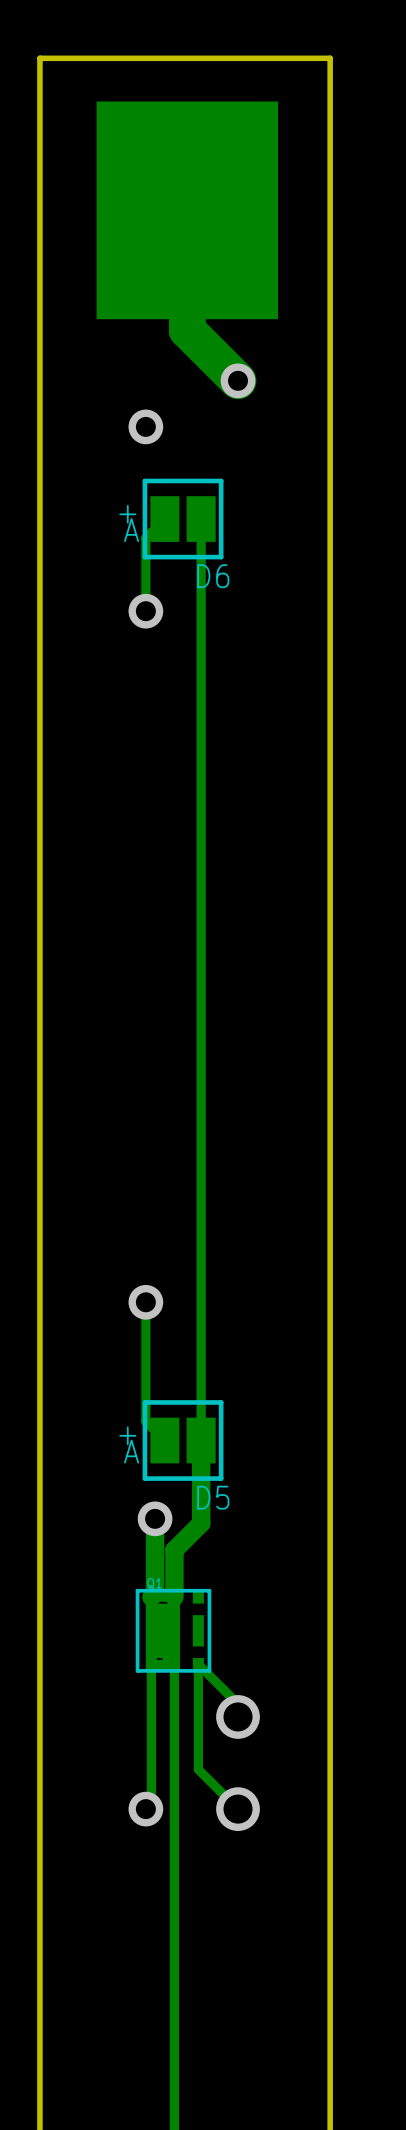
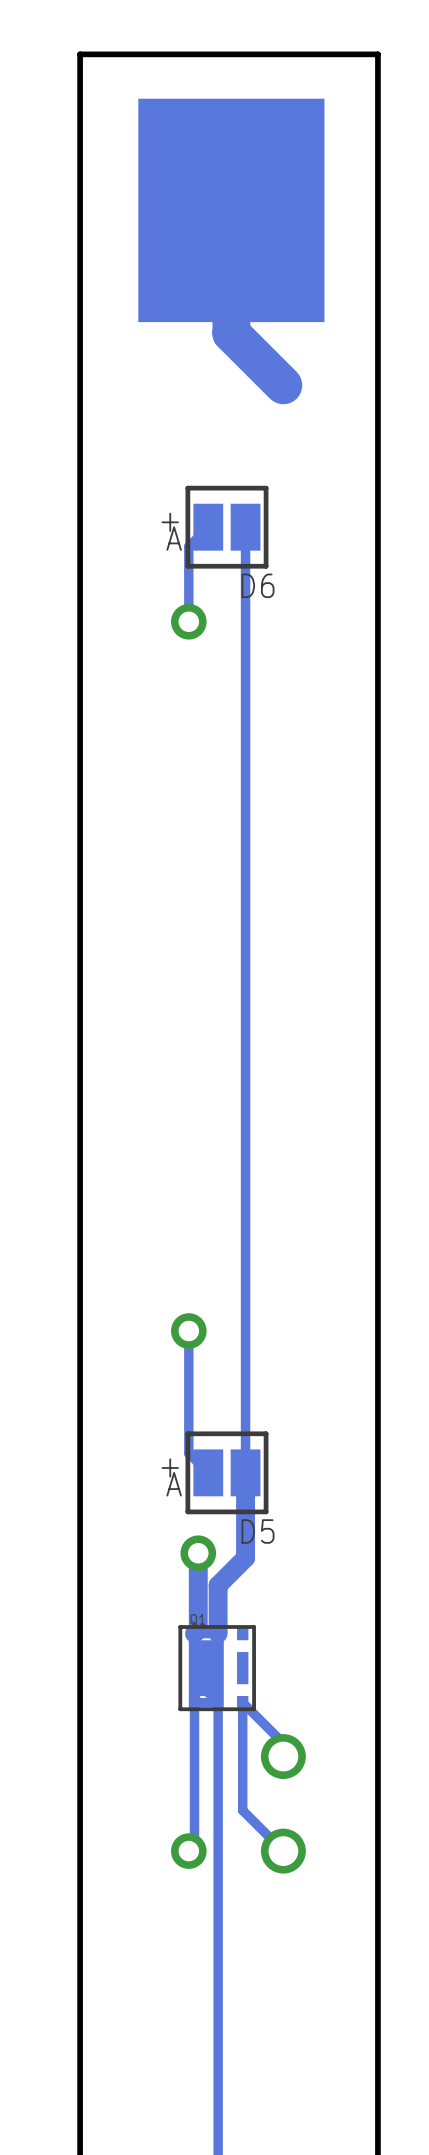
via: (238, 380) -> none
via: (145, 426) -> none

